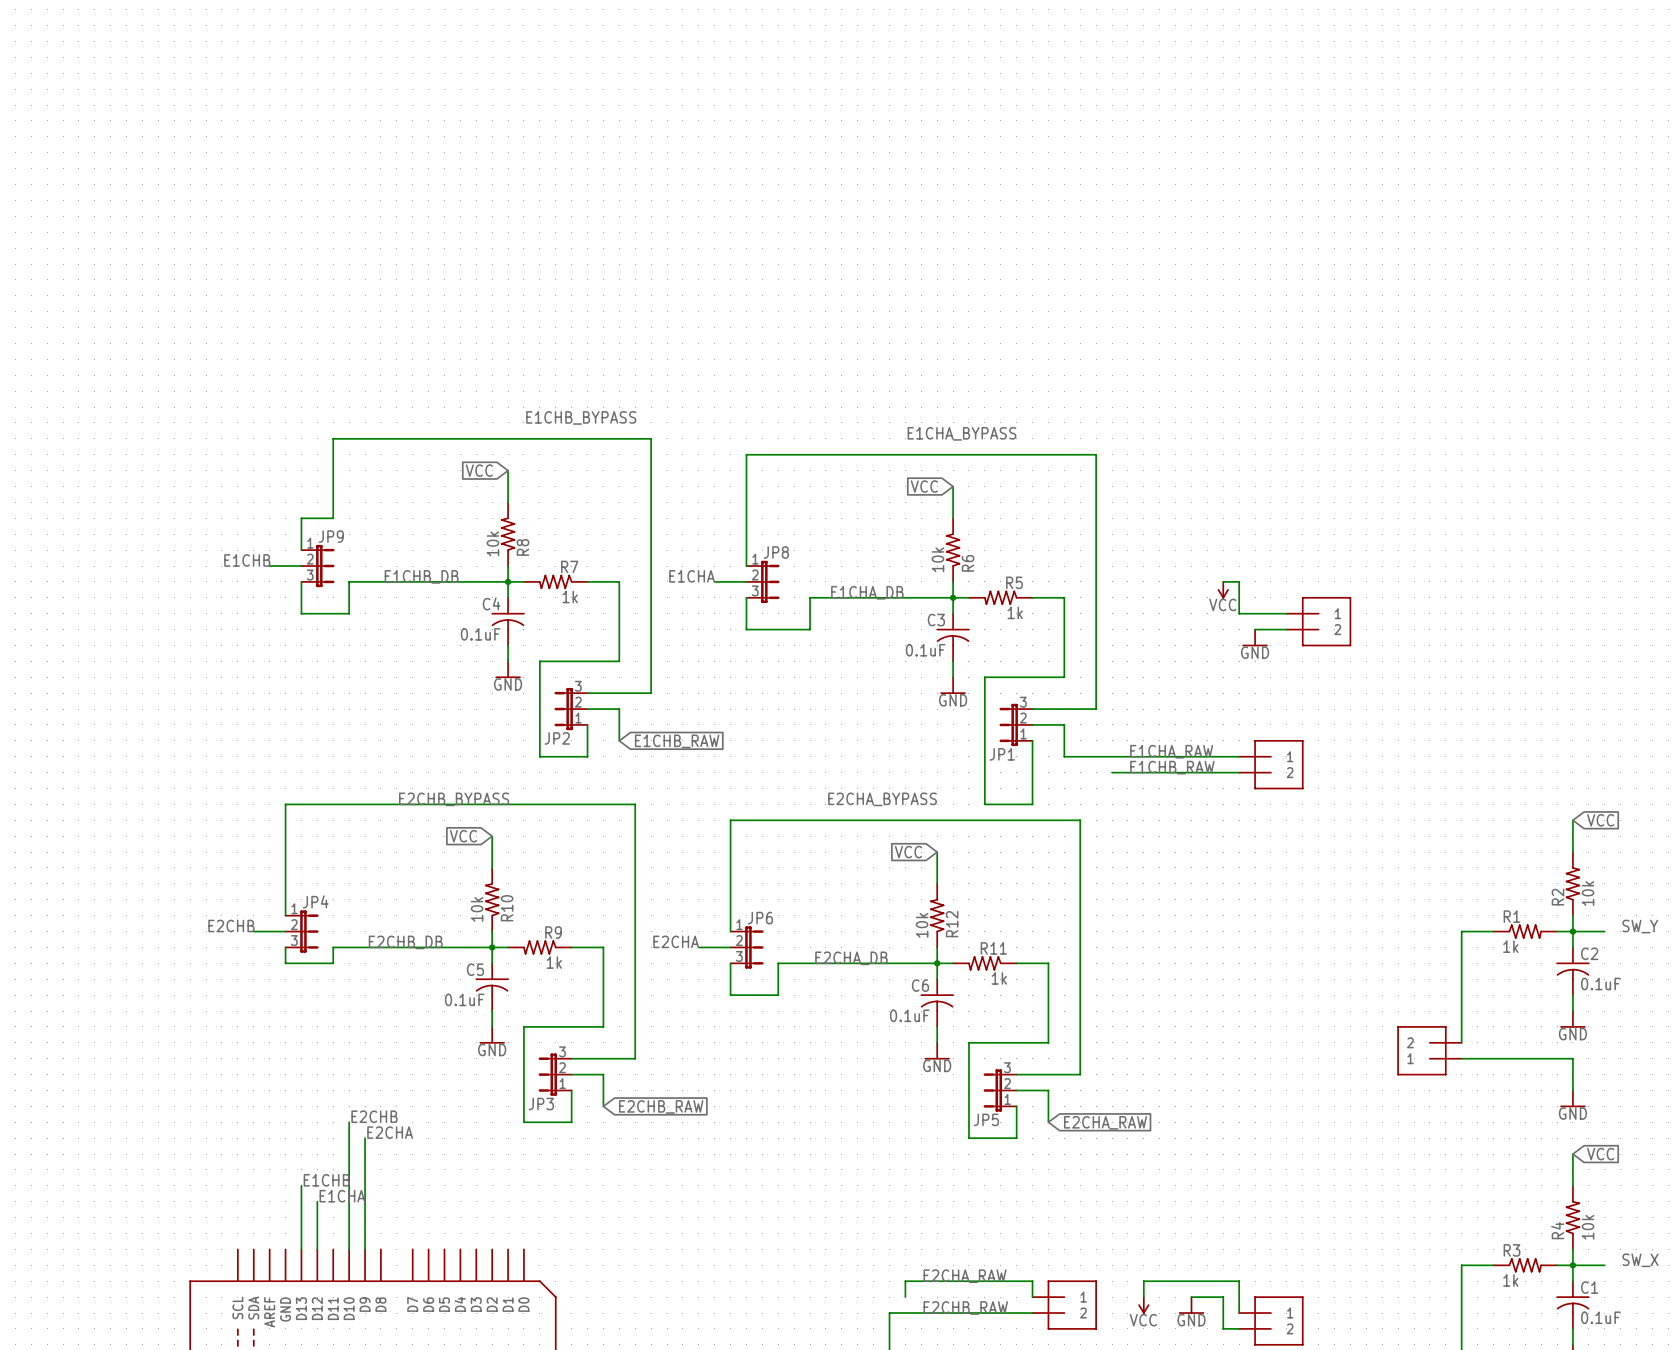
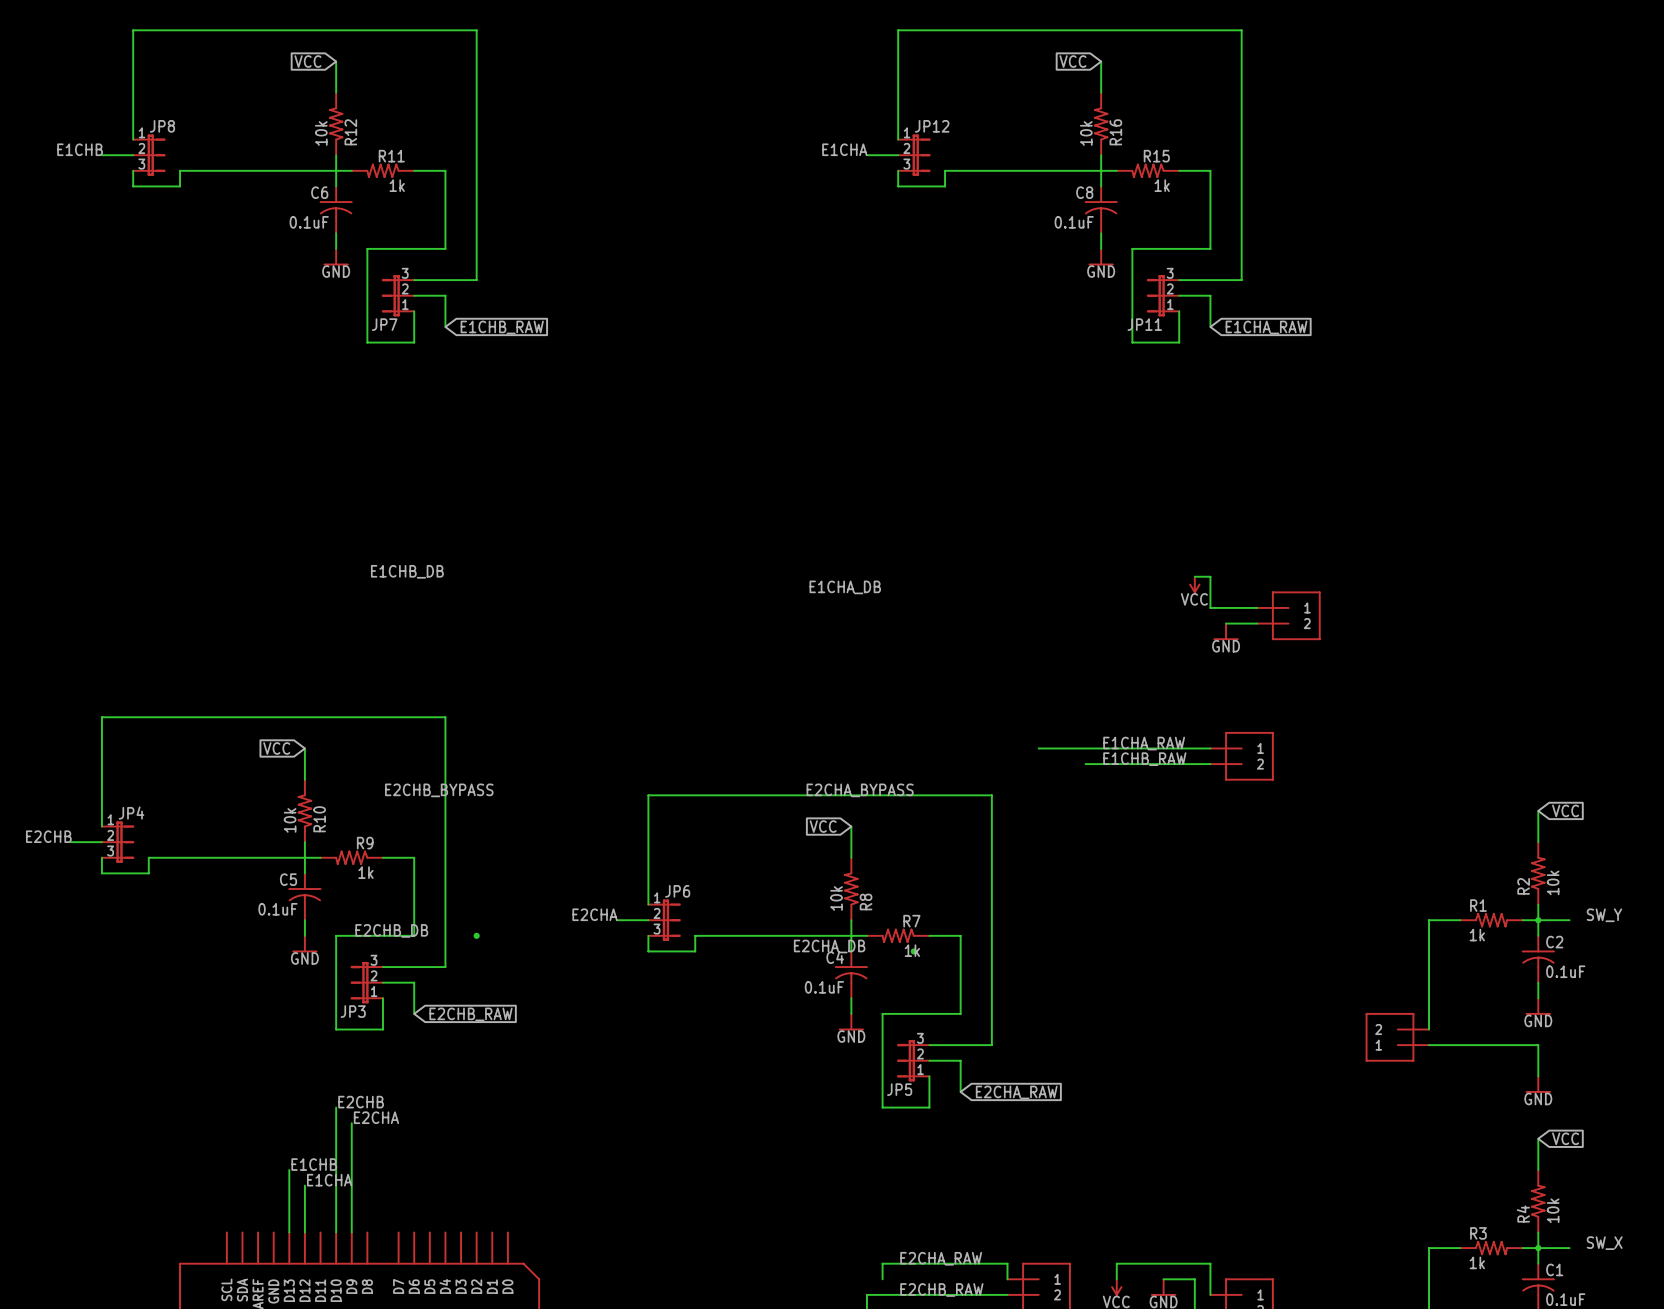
global label: none -> VCC (307, 61)
wire: none -> (336, 61) (336, 92)
global label: none -> VCC (1072, 61)
wire: none -> (1101, 61) (1101, 92)
R16: none -> 10k (1101, 123)
wire: none -> (133, 139) (133, 30) (476, 30) (476, 280) (414, 280)
wire: none -> (898, 139) (898, 30) (1241, 30) (1241, 280) (1179, 280)
label: none -> E1CHB (80, 149)
label: none -> E1CHA (844, 149)
wire: none -> (101, 155) (133, 155)
wire: none -> (336, 155) (336, 186)
wire: none -> (866, 155) (898, 155)
JP12: none -> (914, 155)
wire: none -> (1101, 155) (1101, 186)
wire: none -> (133, 170) (133, 186) (180, 186) (180, 170) (351, 170)
wire: none -> (414, 170) (445, 170) (445, 248) (367, 248) (367, 342) (414, 342) (414, 311)
wire: none -> (898, 170) (898, 186) (945, 186) (945, 170) (1116, 170)
R15: none -> 1k (1147, 170)
wire: none -> (1179, 170) (1210, 170) (1210, 248) (1132, 248) (1132, 342) (1179, 342) (1179, 311)
C8: none -> 0.1uF (1101, 209)
wire: none -> (336, 233) (336, 248)
wire: none -> (1101, 233) (1101, 248)
power symbol: none -> GND (336, 257)
power symbol: none -> GND (1101, 257)
JP7: none -> (397, 295)
wire: none -> (414, 295) (445, 295) (445, 326)
JP11: none -> (1162, 295)
wire: none -> (1179, 295) (1210, 295) (1210, 326)
global label: none -> E1CHB_RAW (502, 327)
global label: none -> E1CHA_RAW (1266, 327)
label: E1CHB_BYPASS (581, 417) -> none
label: E1CHA_BYPASS (962, 433) -> none
global label: VCC (479, 470) -> none
wire: (508, 470) (508, 502) -> none
global label: VCC (924, 486) -> none
wire: (953, 486) (953, 518) -> none
R8 position: (508, 534) -> (851, 888)
wire: (301, 550) (301, 518) (333, 518) (333, 438) (651, 438) (651, 693) (587, 693) -> none
R6: 10k (953, 550) -> none
label: E1CHB (247, 560) -> none
wire: (269, 566) (301, 566) -> none
JP9: (317, 566) -> none
wire: (508, 566) (508, 597) -> none
wire: (746, 566) (746, 454) (1096, 454) (1096, 709) (1032, 709) -> none
label: E1CHA (692, 576) -> none
wire: (301, 581) (301, 613) (349, 613) (349, 581) (523, 581) -> none
junction: (508, 581) -> none
R7 position: (555, 581) -> (898, 935)
wire: (587, 581) (619, 581) (619, 661) (539, 661) (539, 756) (587, 756) (587, 724) -> none
wire: (714, 581) (746, 581) -> none
JP8 position: (763, 581) -> (149, 155)
wire: (953, 581) (953, 613) -> none
wire: (746, 597) (746, 629) (810, 629) (810, 597) (968, 597) -> none
junction: (953, 597) -> none
R5: 1k (1000, 597) -> none
wire: (1032, 597) (1064, 597) (1064, 677) (984, 677) (984, 804) -> (648, 904) (648, 795) (960, 795)
C4 position: (508, 621) -> (851, 974)
C3: 0.1uF (953, 637) -> none
wire: (508, 645) (508, 661) -> none
wire: (953, 661) (953, 677) -> none
power symbol: GND (508, 669) -> none
power symbol: GND (953, 685) -> none
JP2: (571, 709) -> none
wire: (587, 709) (619, 709) (619, 740) -> none
JP1: (1016, 724) -> none
wire: (1032, 724) (1064, 724) (1064, 756) -> none
wire: (1032, 740) (1032, 804) (1016, 804) -> (929, 1045) (991, 1045) (991, 795)
global label: E1CHB_RAW (677, 741) -> none
global label: none -> VCC (276, 748)
wire: none -> (304, 748) (304, 779)
wire: none -> (101, 826) (101, 717) (445, 717) (445, 967) (382, 967)
global label: VCC (463, 836) -> none
wire: (492, 836) (492, 867) -> none
label: none -> E2CHB (48, 836)
wire: none -> (70, 842) (101, 842)
wire: none -> (304, 842) (304, 873)
global label position: VCC (908, 852) -> VCC (823, 826)
wire: (937, 852) (937, 883) -> (851, 826) (851, 857)
wire: none -> (101, 857) (101, 873) (148, 873) (148, 857) (320, 857)
R10 position: (492, 899) -> (304, 810)
wire: (285, 915) (285, 804) (635, 804) (635, 1058) (571, 1058) -> none
R12 position: (937, 915) -> (336, 123)
label: E2CHB (231, 926) -> none
wire: (253, 931) (285, 931) -> none
JP4 position: (302, 931) -> (118, 842)
wire: none -> (304, 920) (304, 935)
wire: (492, 931) (492, 963) -> none
wire: none -> (617, 920) (648, 920)
wire: (730, 931) (730, 820) (1080, 820) (1080, 1074) (1016, 1074) -> none
label position: E2CHA (676, 941) -> E2CHA (595, 914)
wire: (285, 947) (285, 963) (333, 963) (333, 947) (349, 947) -> (382, 998) (382, 1029) (336, 1029) (336, 935)
wire: (428, 947) (508, 947) -> (414, 935) (414, 857) (382, 857)
R9 position: (539, 947) -> (351, 857)
wire: (571, 947) (603, 947) (603, 1026) (523, 1026) (523, 1122) (571, 1122) (571, 1090) -> none
wire: (698, 947) (714, 947) -> (648, 935) (648, 951) (695, 951) (695, 935)
wire: none -> (710, 935) (866, 935)
JP6 position: (747, 947) -> (664, 920)
wire: (937, 947) (937, 979) -> (851, 920) (851, 951)
power symbol: none -> GND (304, 944)
wire: (730, 963) (730, 995) (778, 995) (778, 963) (953, 963) -> none
R11 position: (984, 963) -> (382, 170)
wire: (1016, 963) (1048, 963) (1048, 1042) (968, 1042) (968, 1138) (1016, 1138) (1016, 1106) -> (929, 935) (960, 935) (960, 1013) (882, 1013) (882, 1107) (929, 1107) (929, 1076)
C5 position: (492, 987) -> (304, 896)
wire: none -> (382, 982) (414, 982) (414, 1013)
C6 position: (937, 1003) -> (336, 209)
wire: (492, 1011) (492, 1026) -> none
wire: (937, 1026) (937, 1042) -> (851, 998) (851, 1013)
global label: none -> E2CHB_RAW (470, 1014)
power symbol: GND (492, 1035) -> none
power symbol position: GND (937, 1051) -> GND (851, 1022)
JP3 position: (555, 1074) -> (366, 982)
wire: (571, 1074) (603, 1074) (603, 1106) -> none
JP5 position: (1000, 1090) -> (913, 1060)
wire: (1016, 1090) (1048, 1090) (1048, 1122) -> (929, 1060) (960, 1060) (960, 1091)
global label: E2CHB_RAW (661, 1106) -> none
global label position: E2CHA_RAW (1105, 1122) -> E2CHA_RAW (1016, 1092)

